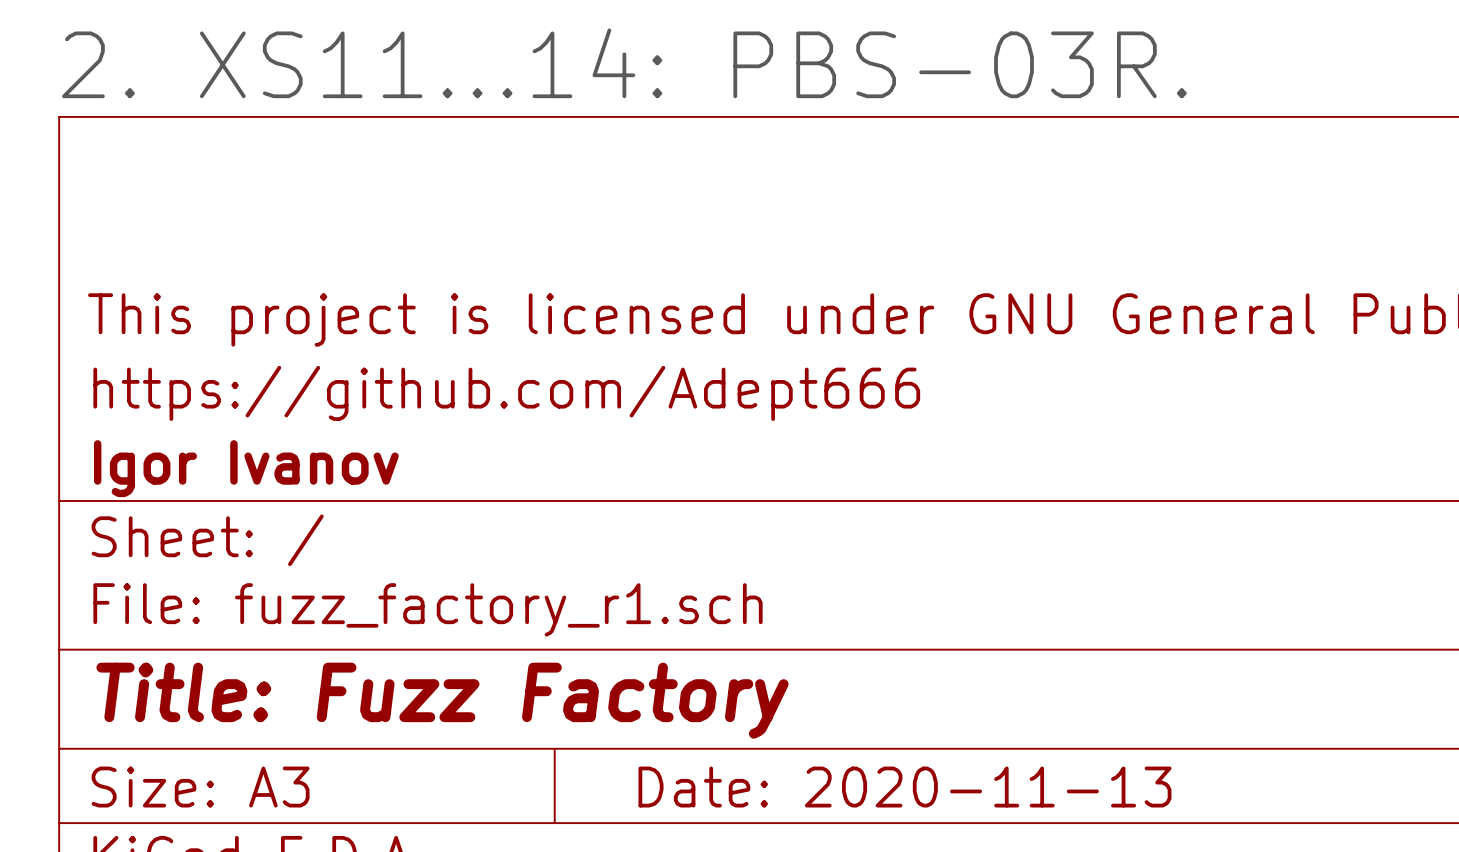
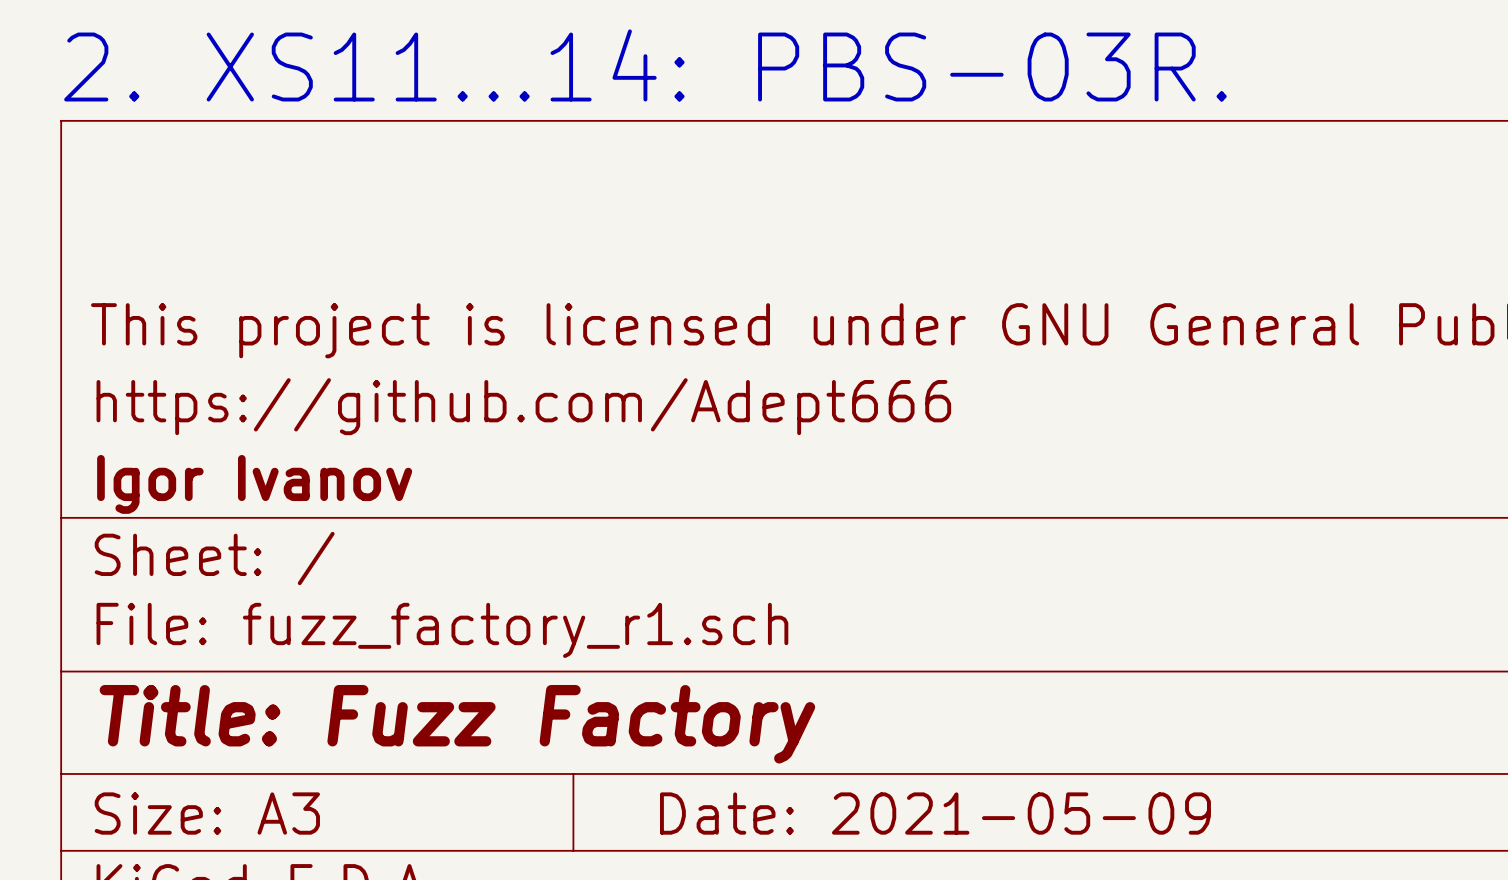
title block: Date: 2020-11-13 (904, 787) -> Date: 2021-05-09 (935, 813)

